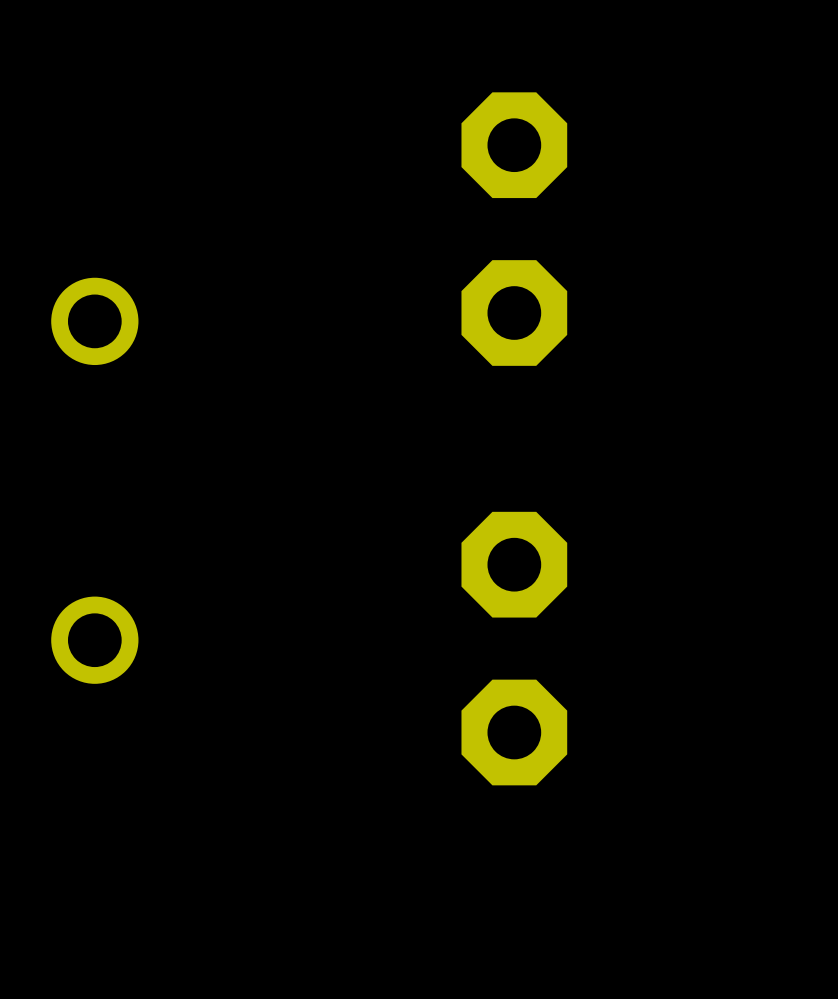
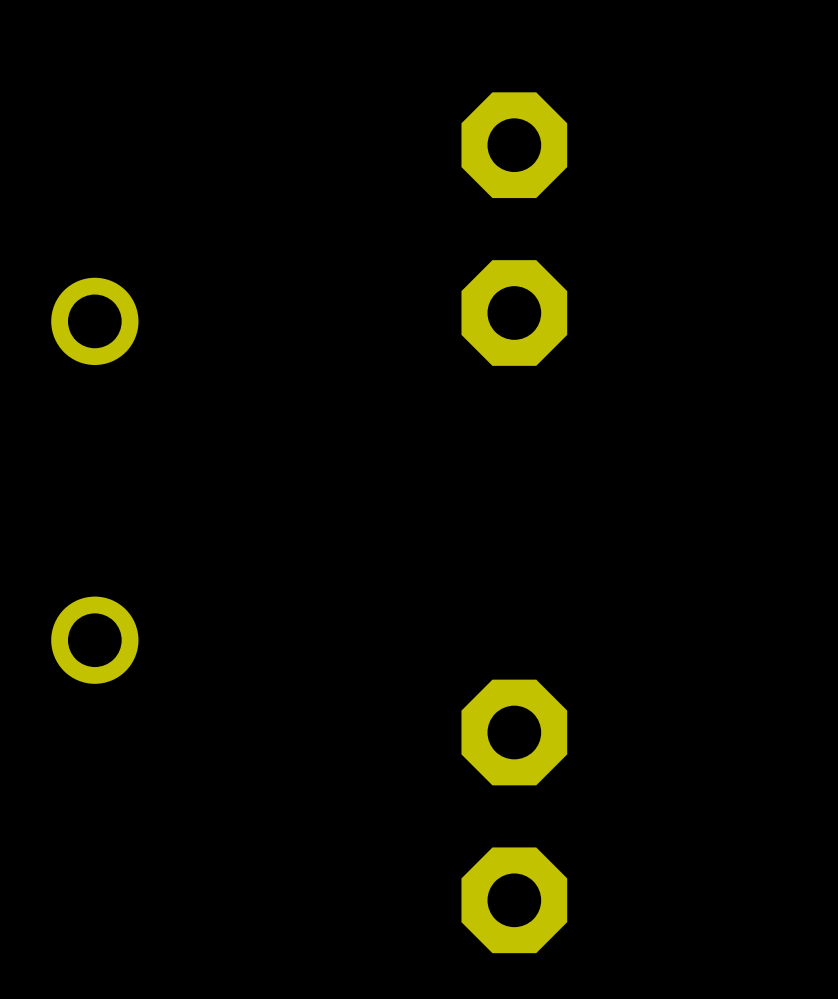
part position: (514, 648) -> (514, 816)

